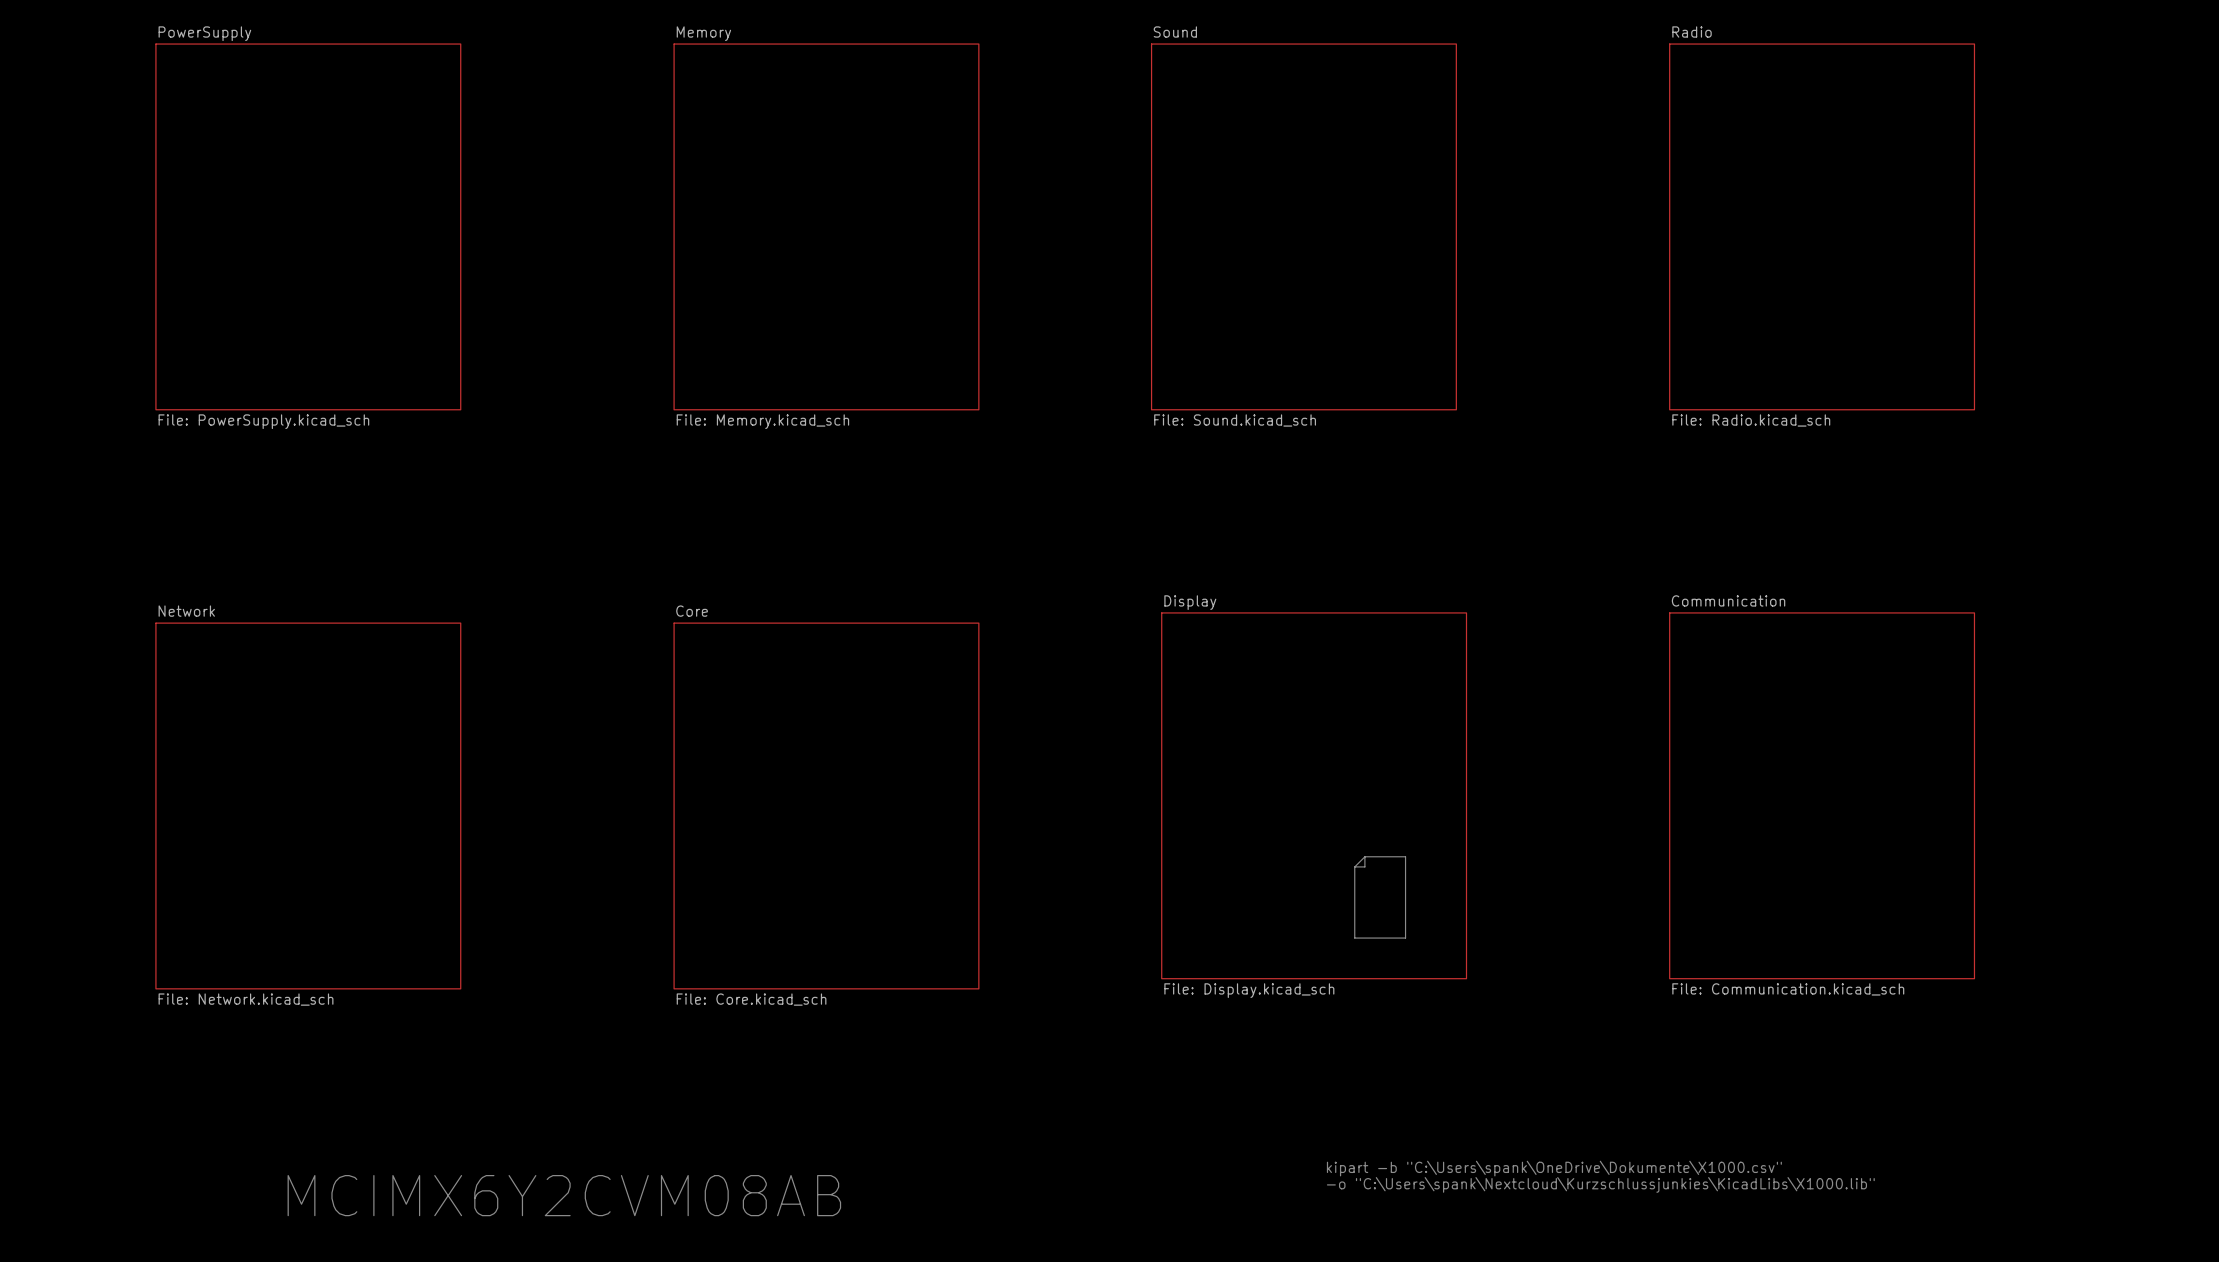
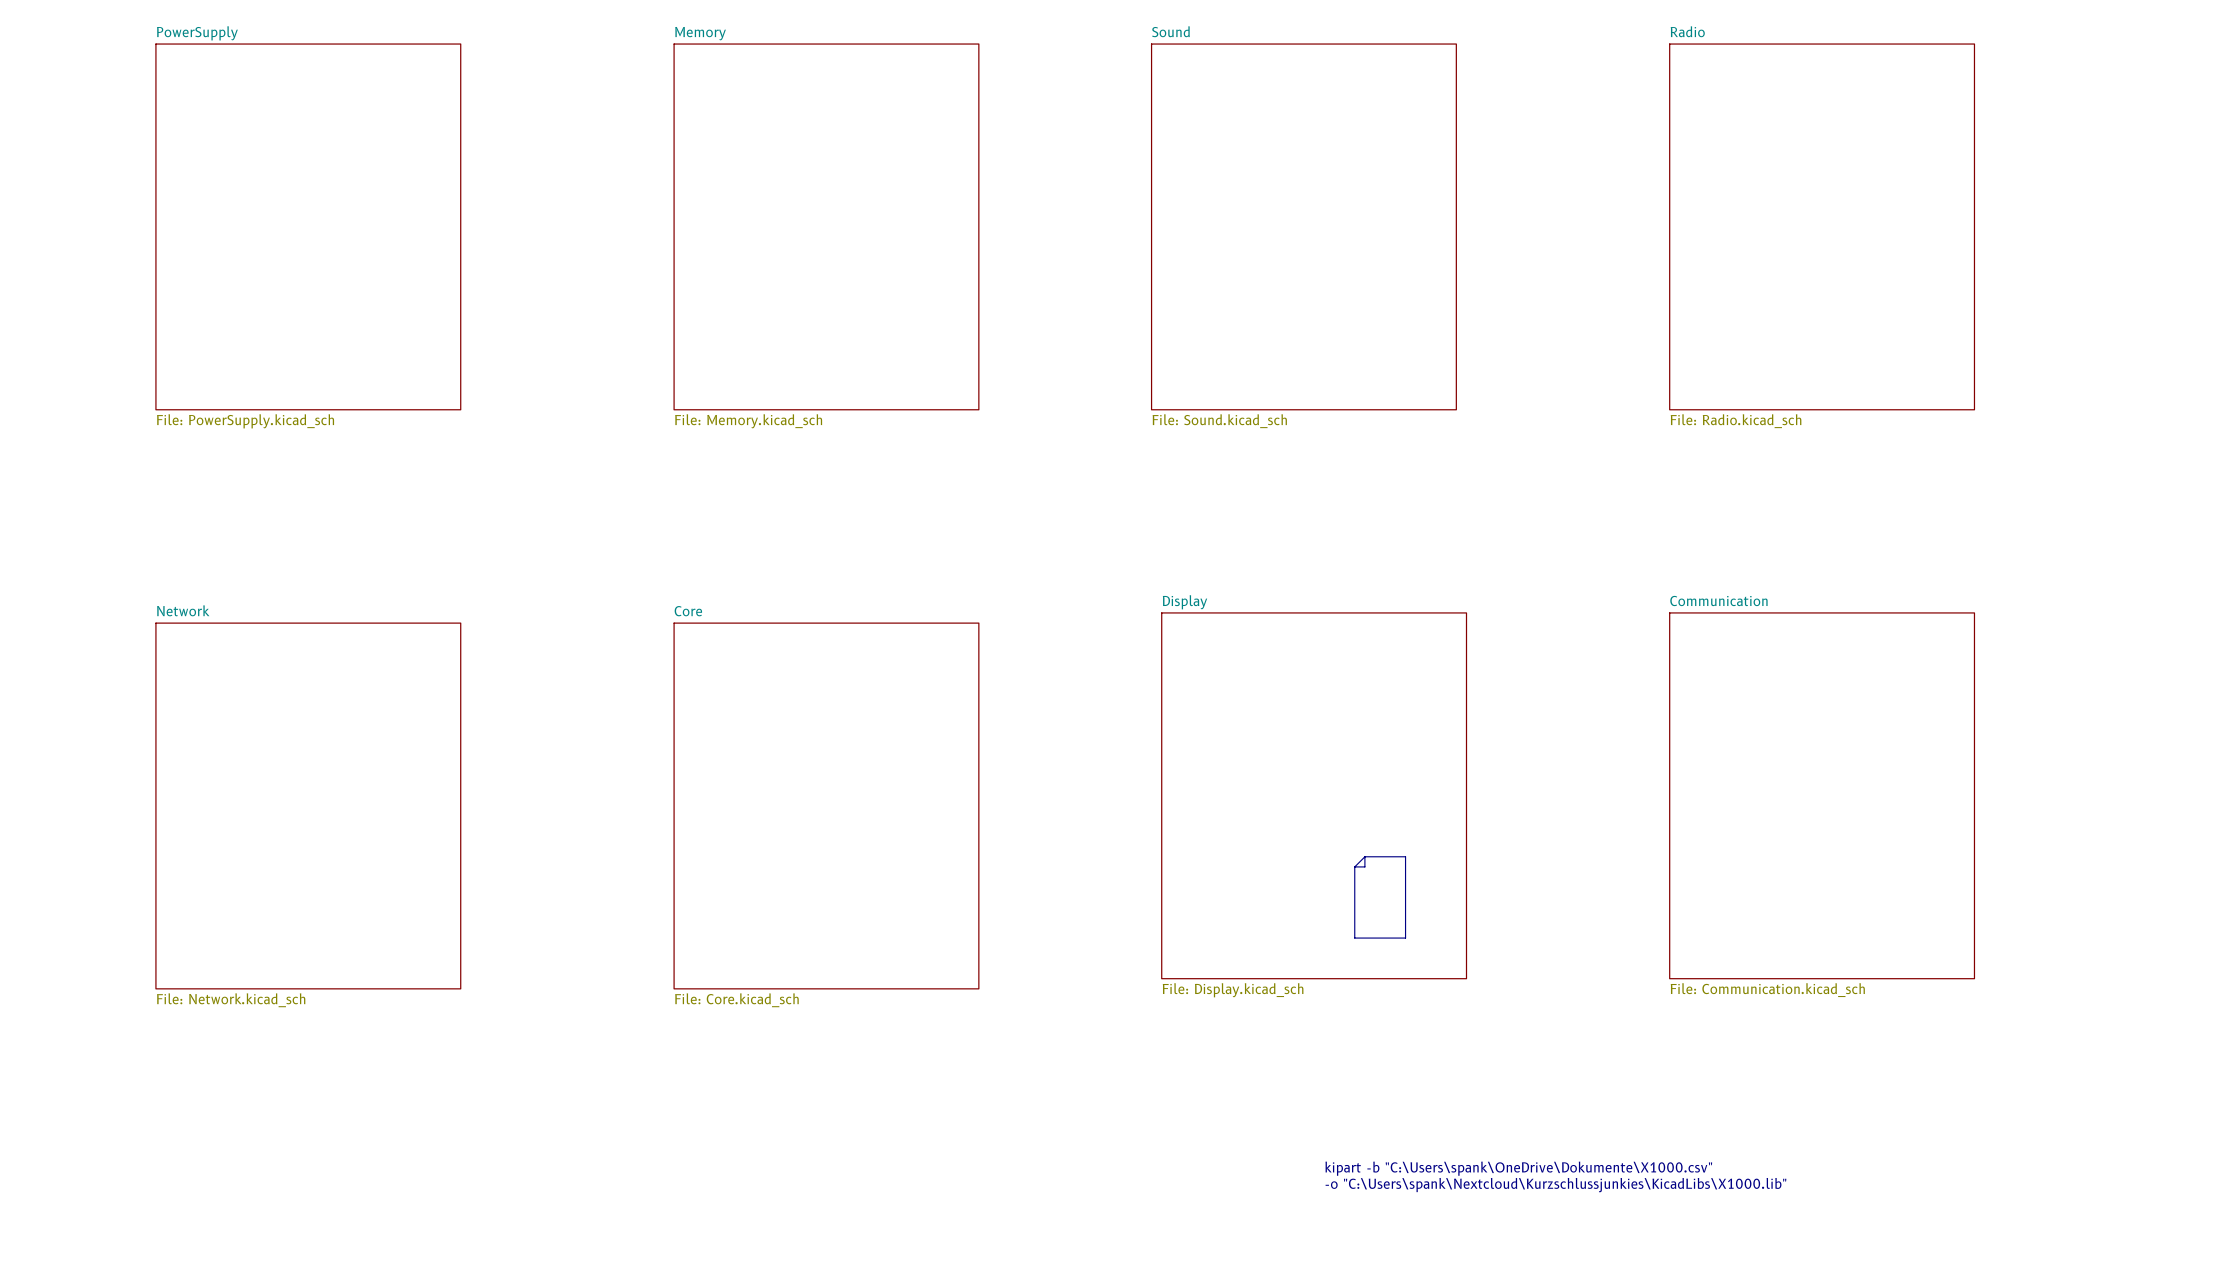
text: MCIMX6Y2CVM08AB (564, 1195) -> none

